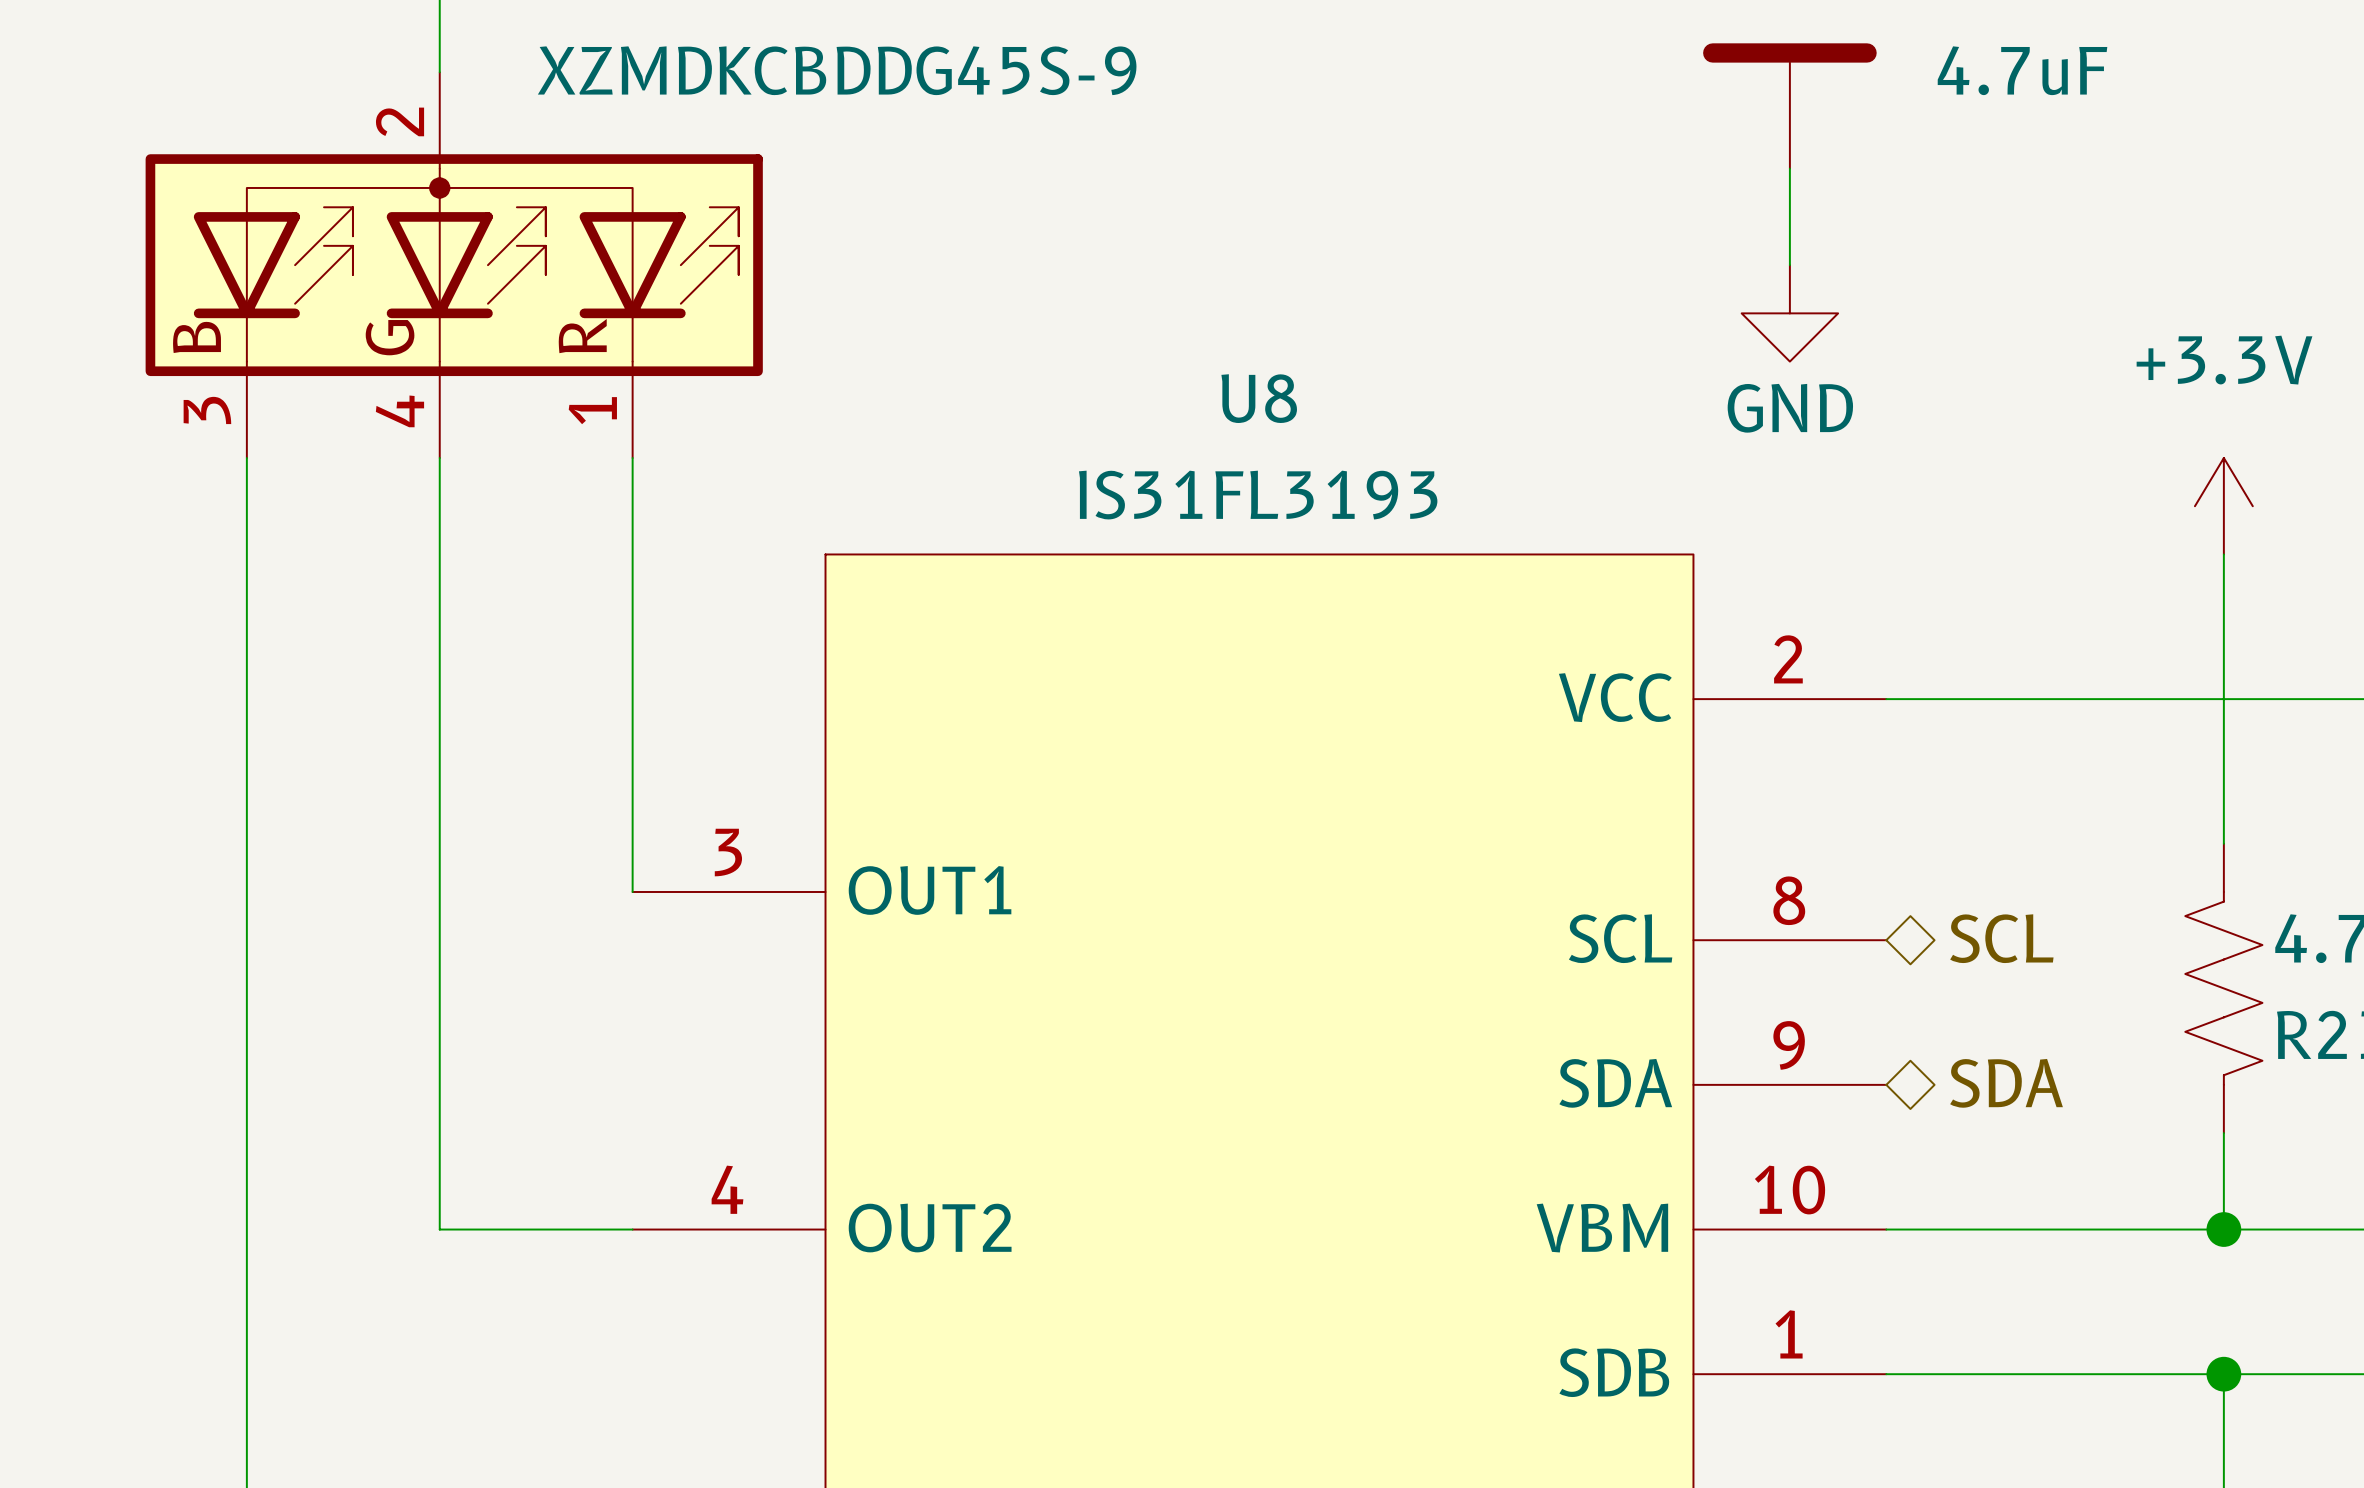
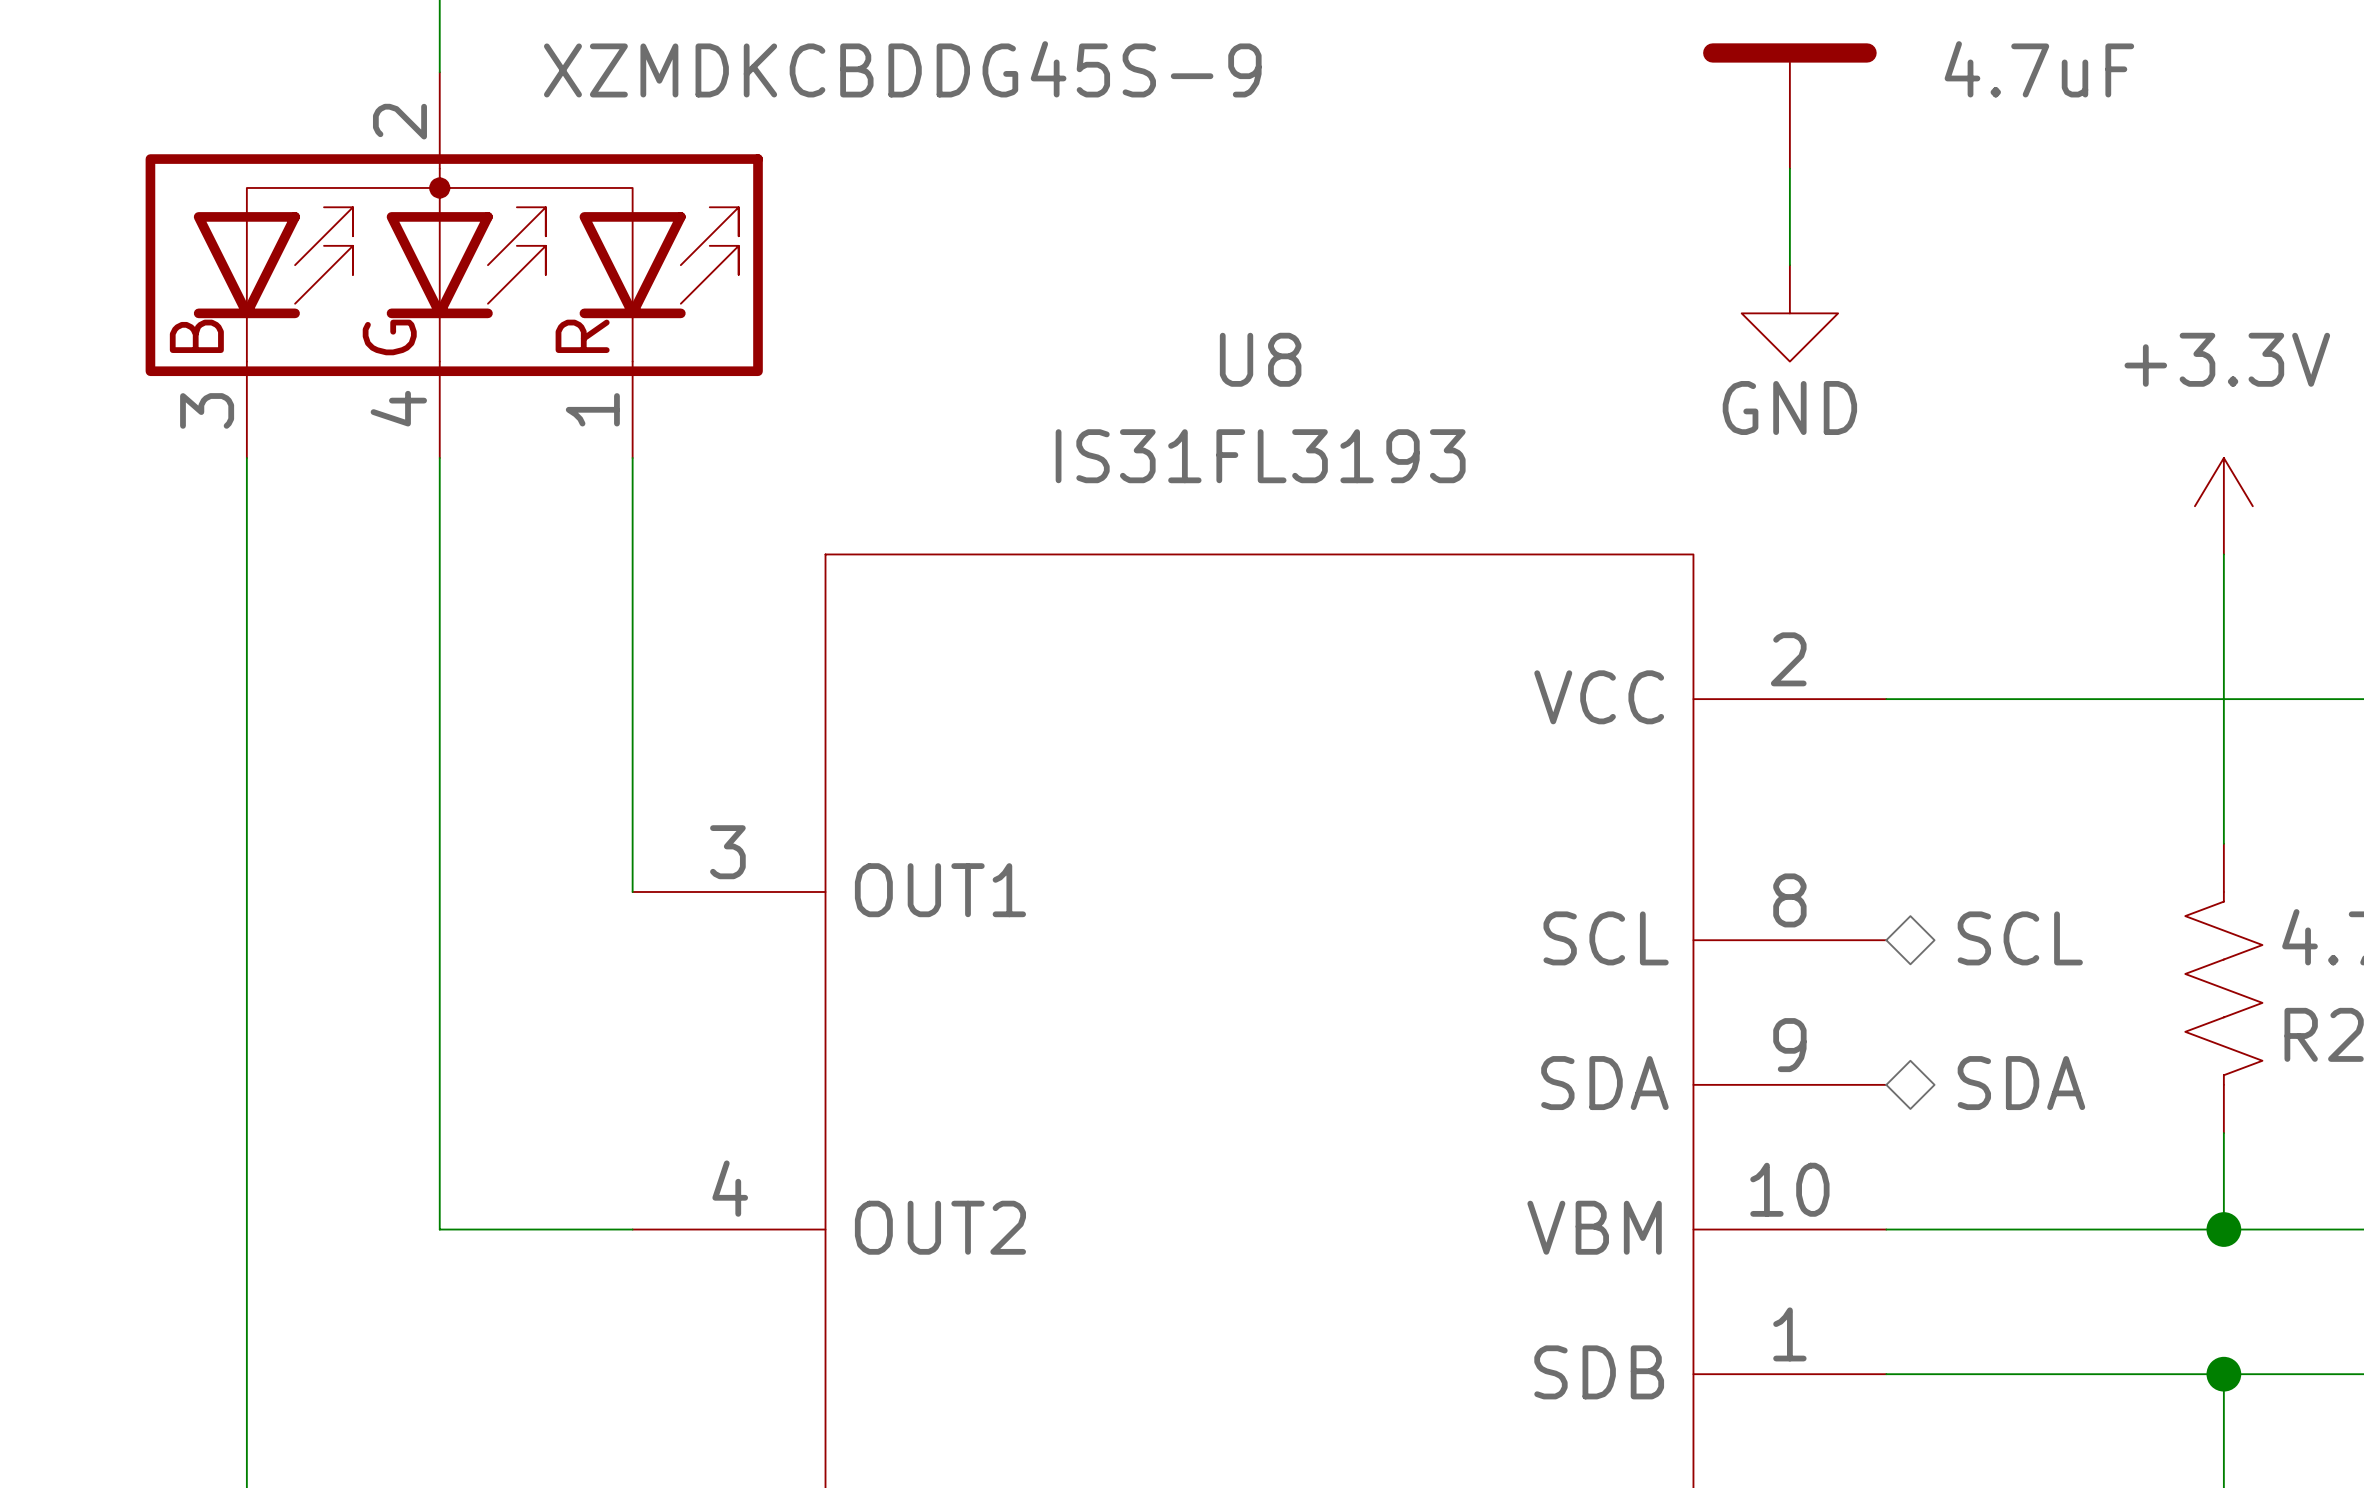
U8 name position: U8 (1259, 398) -> U8 (1260, 359)
U8 value position: IS31FL3193 (1258, 495) -> IS31FL3193 (1260, 456)

